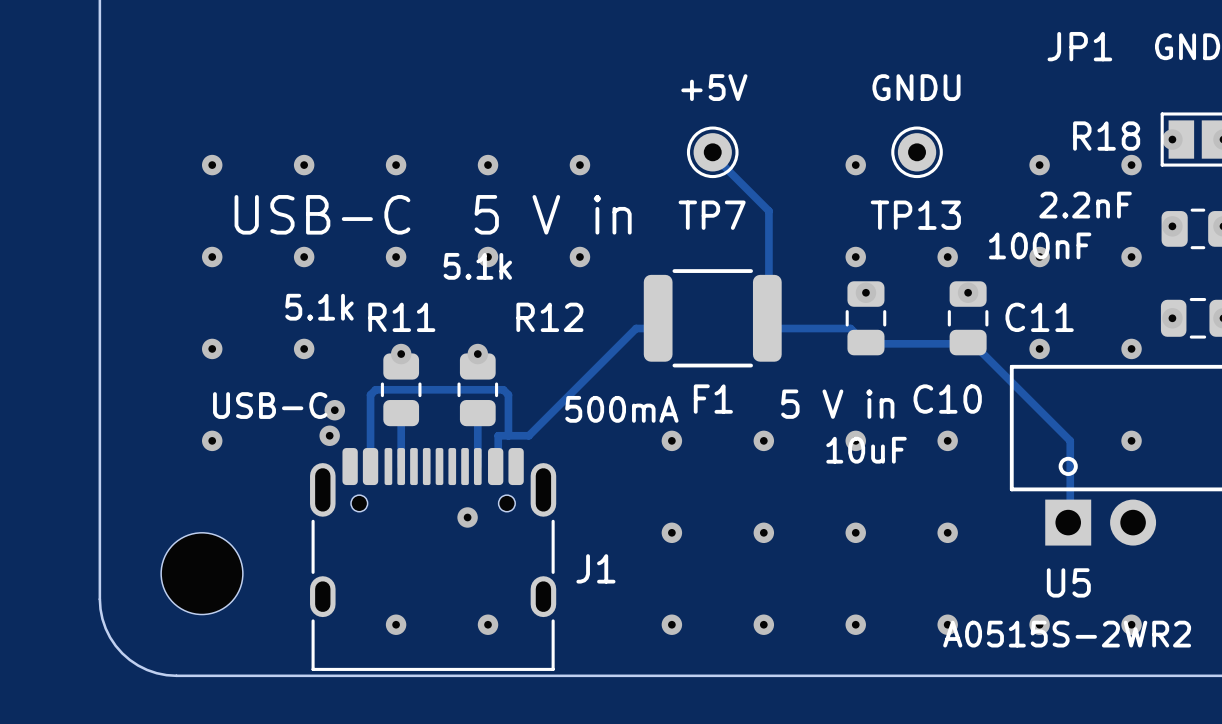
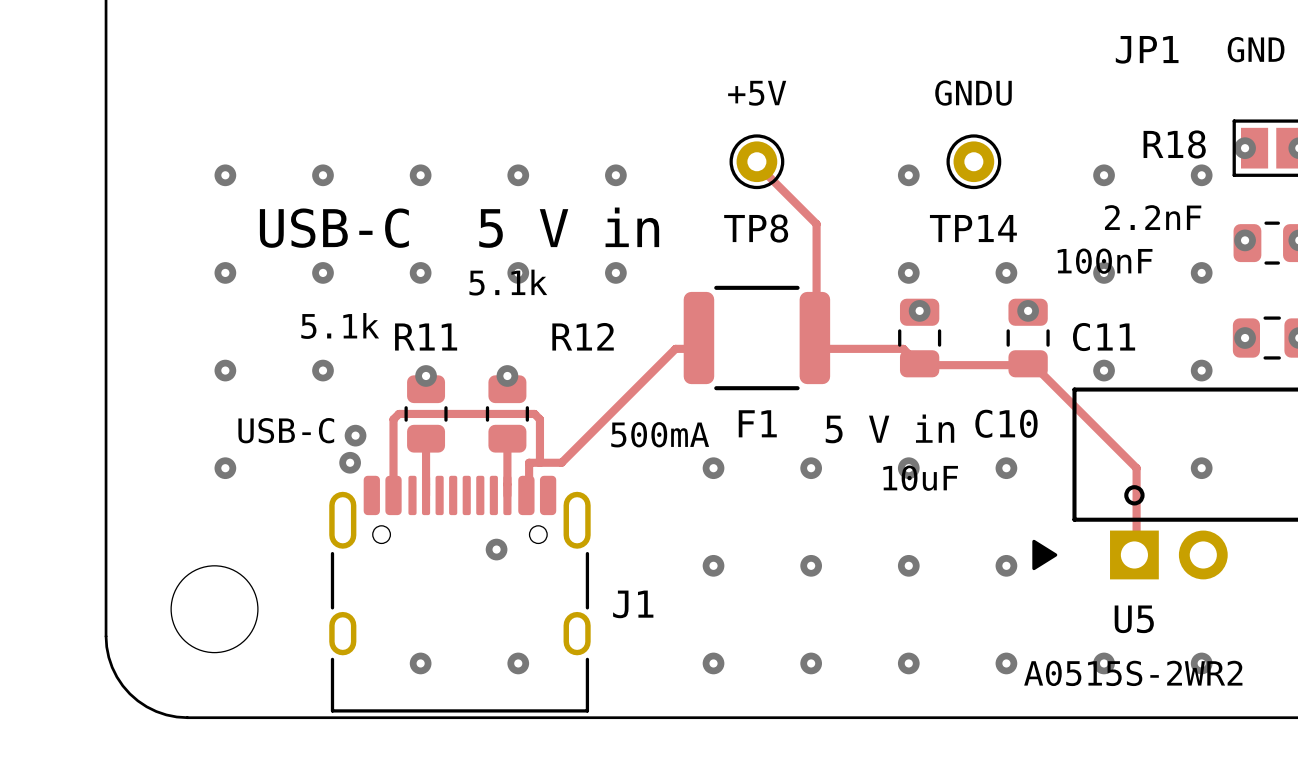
TP7 name: TP7 (712, 215) -> TP8 (756, 228)
TP13 name: TP13 (915, 215) -> TP14 (973, 228)
drawing: none -> [1032, 539, 1058, 571]

